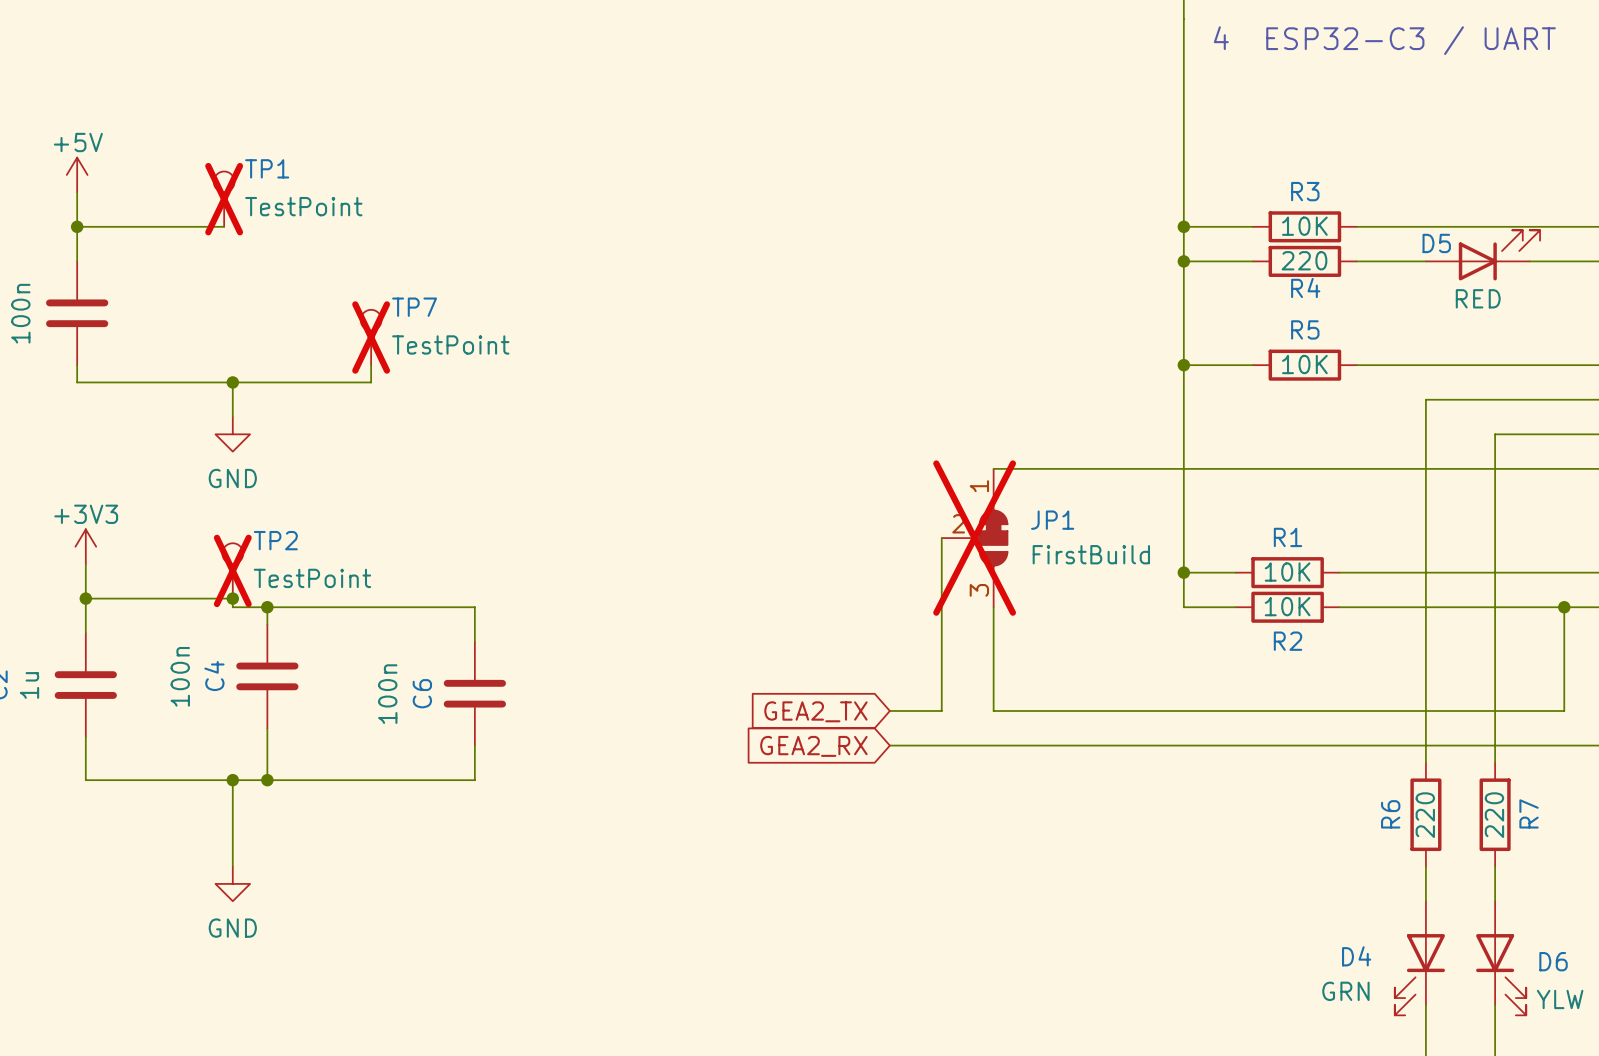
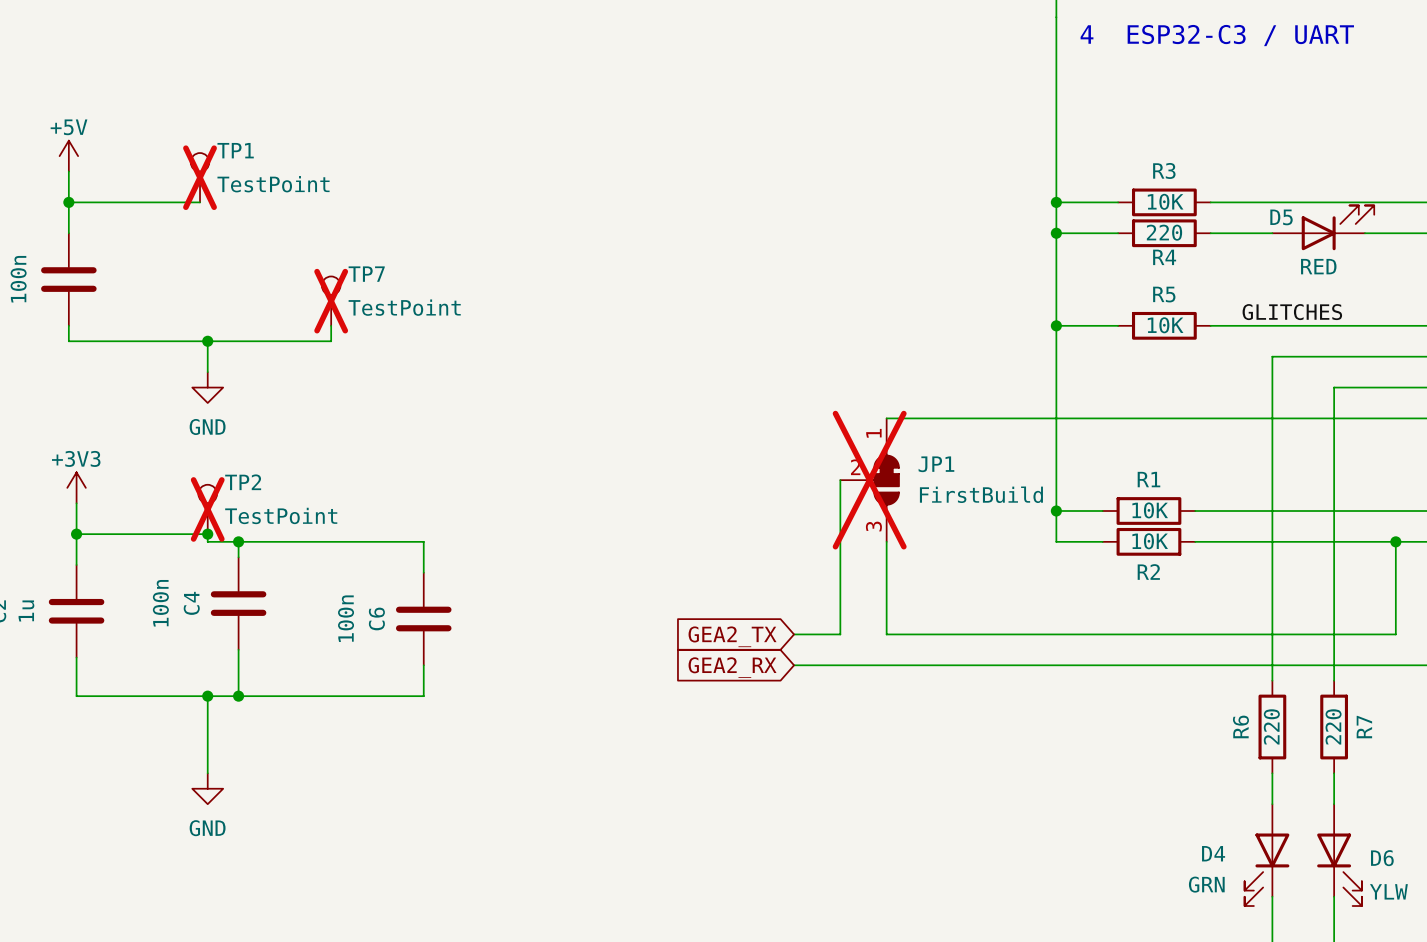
label: none -> GLITCHES (1292, 312)

